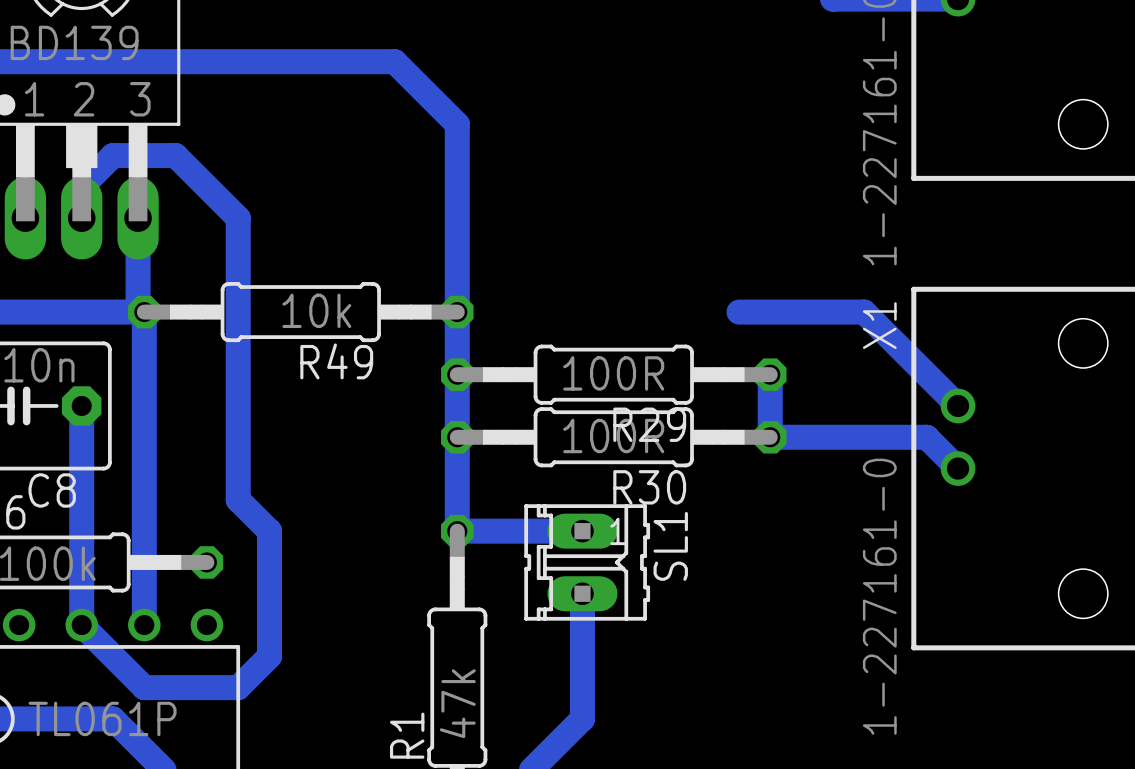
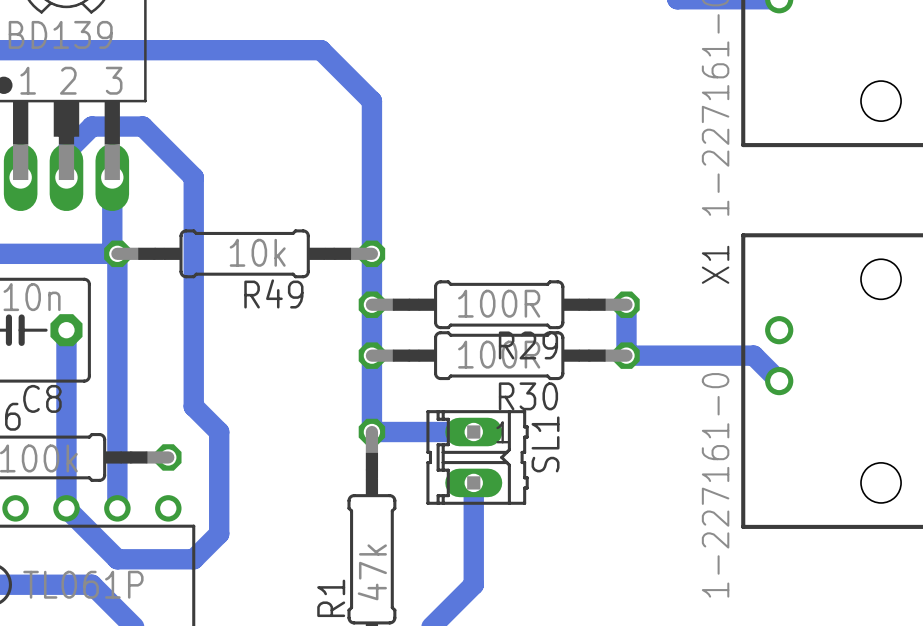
bottom track: (738, 312) (864, 312) (958, 405) -> none

